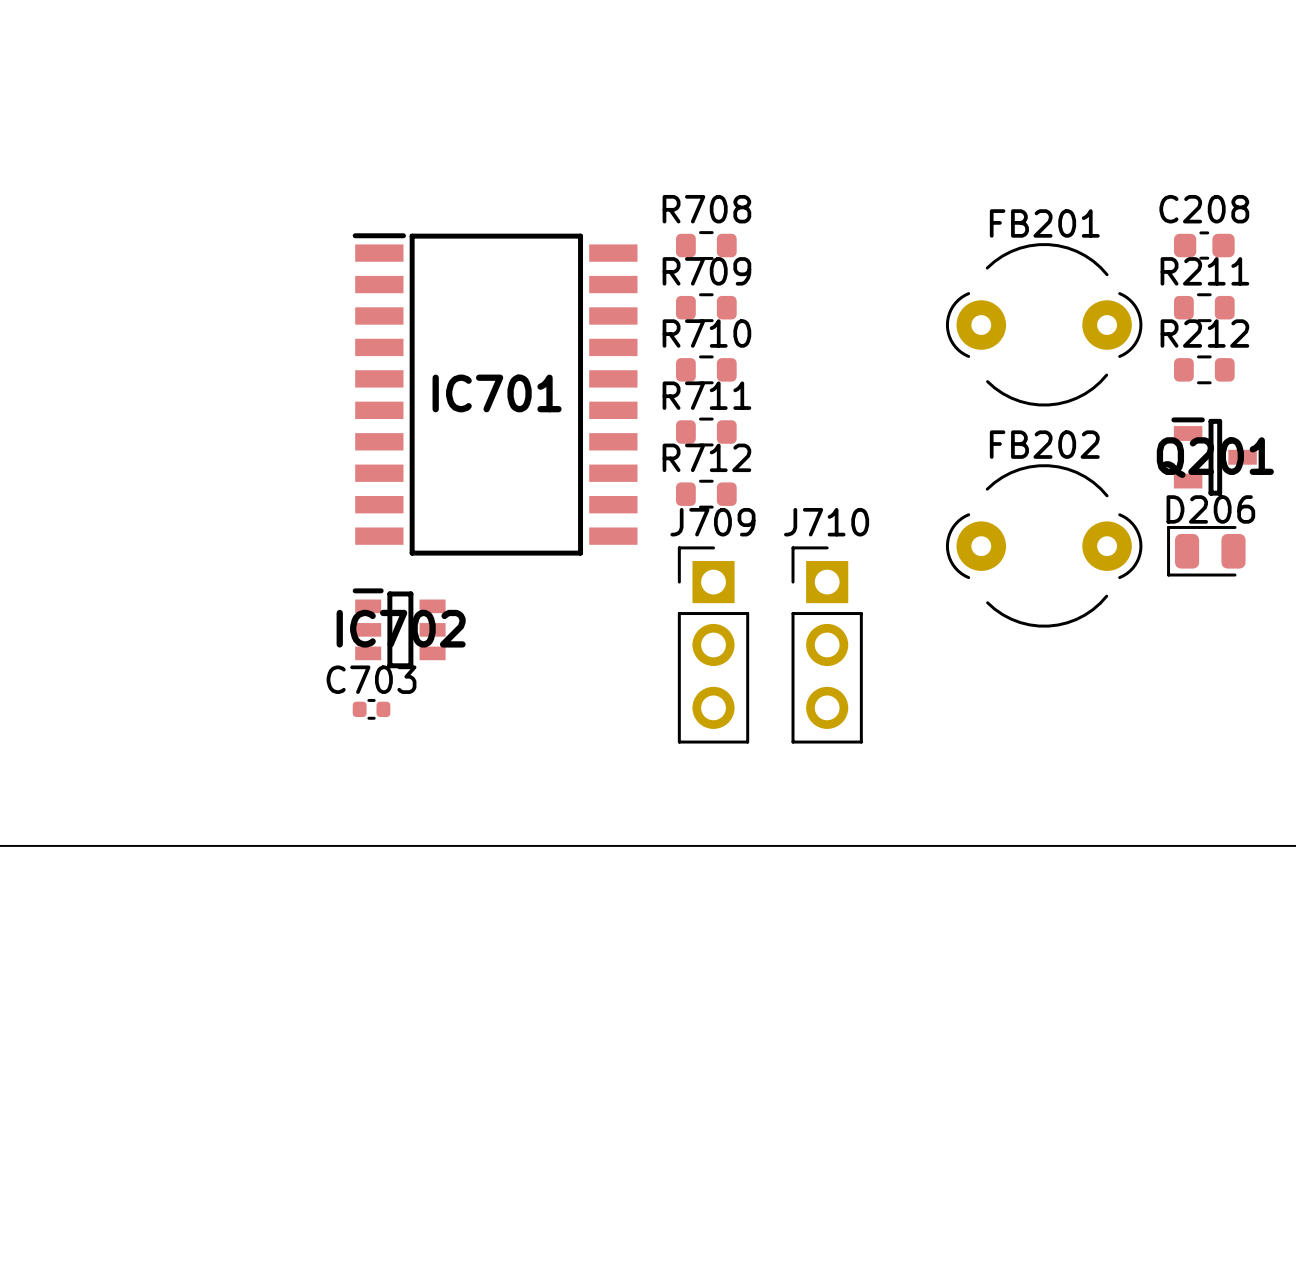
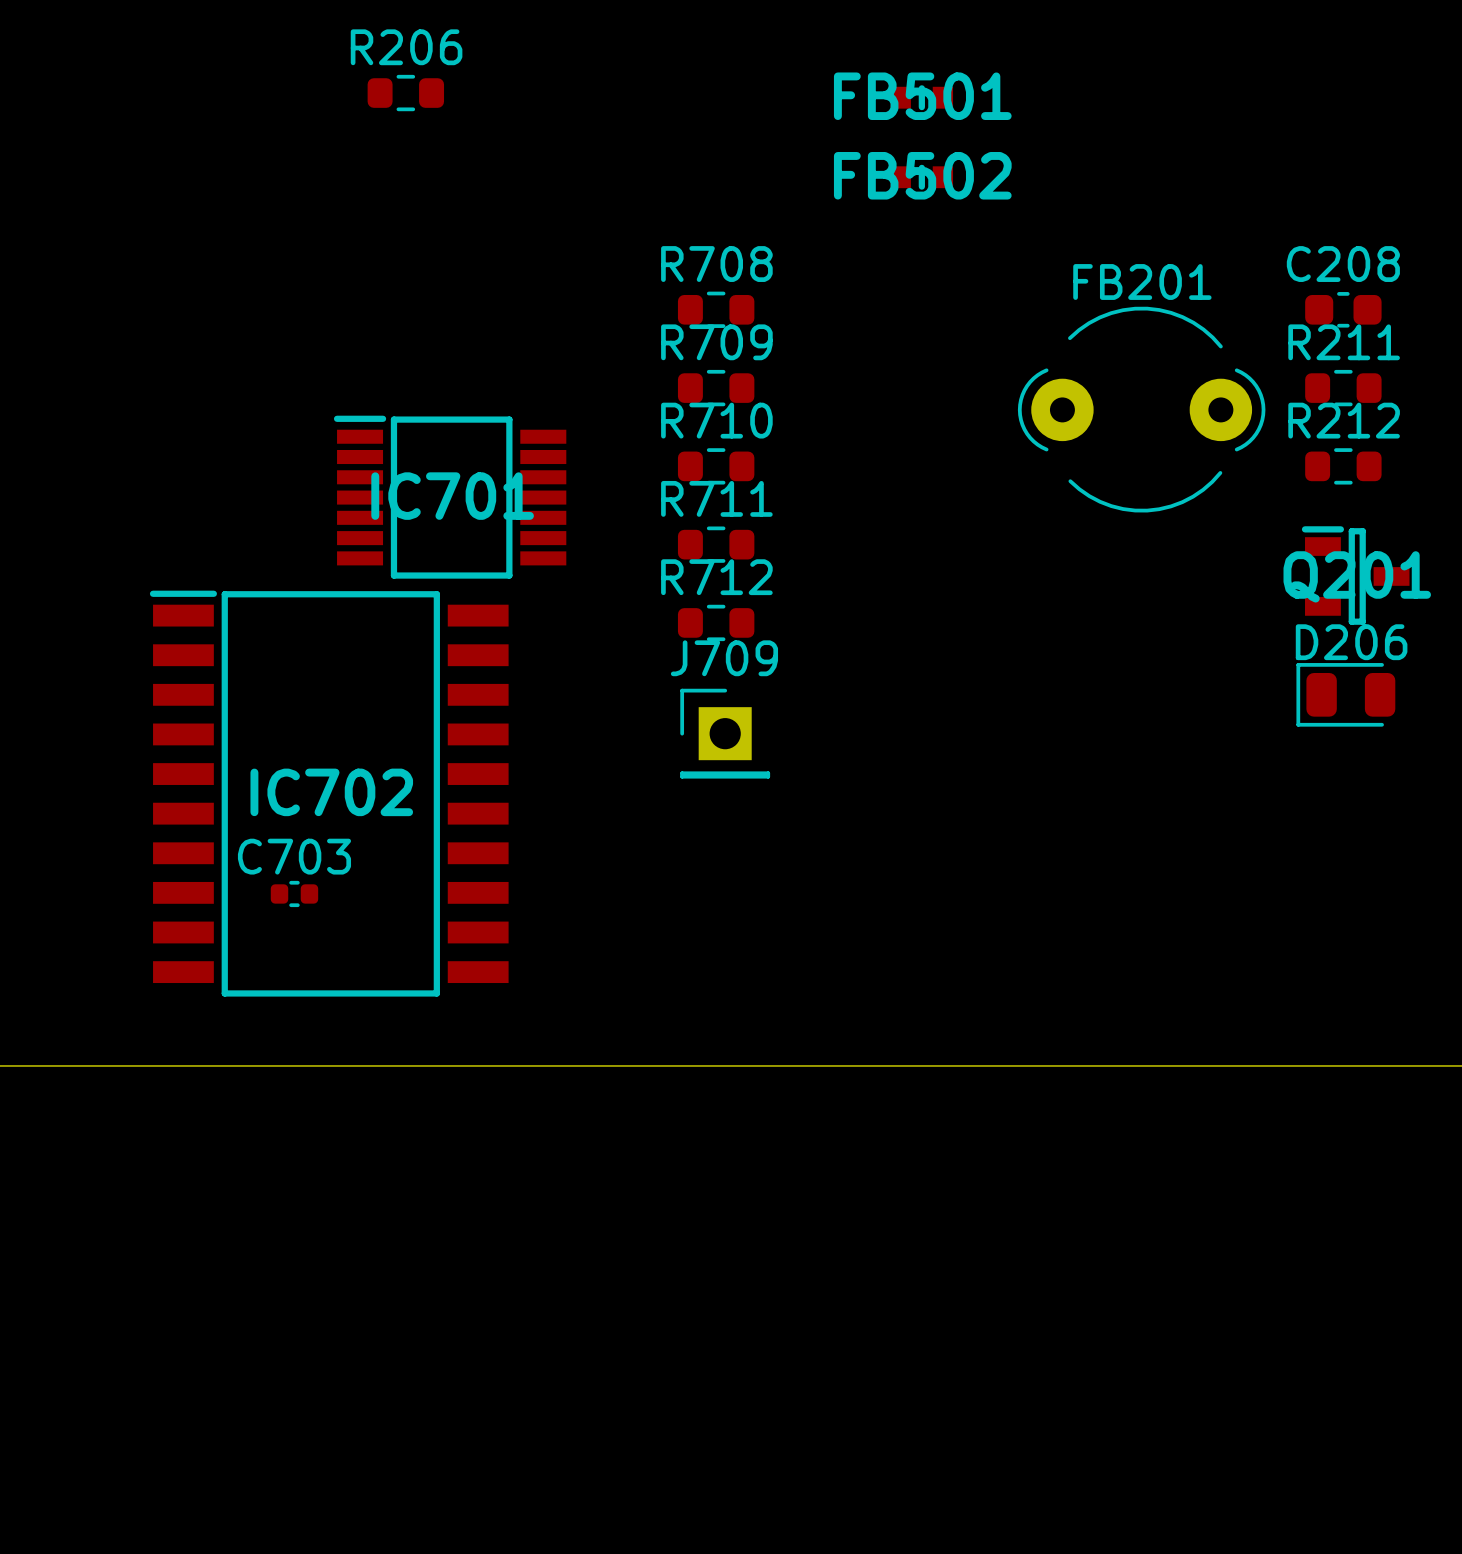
R206: none -> (405, 93)
FB501: none -> (921, 97)
FB502: none -> (921, 177)
IC701 footprint: [352, 233, 638, 556] -> [333, 415, 567, 579]
FB202: (1044, 545) -> none
J709 footprint: [677, 546, 750, 744] -> [680, 688, 771, 779]
IC702 footprint: [352, 588, 446, 669] -> [149, 590, 509, 997]
J710: (827, 644) -> none

